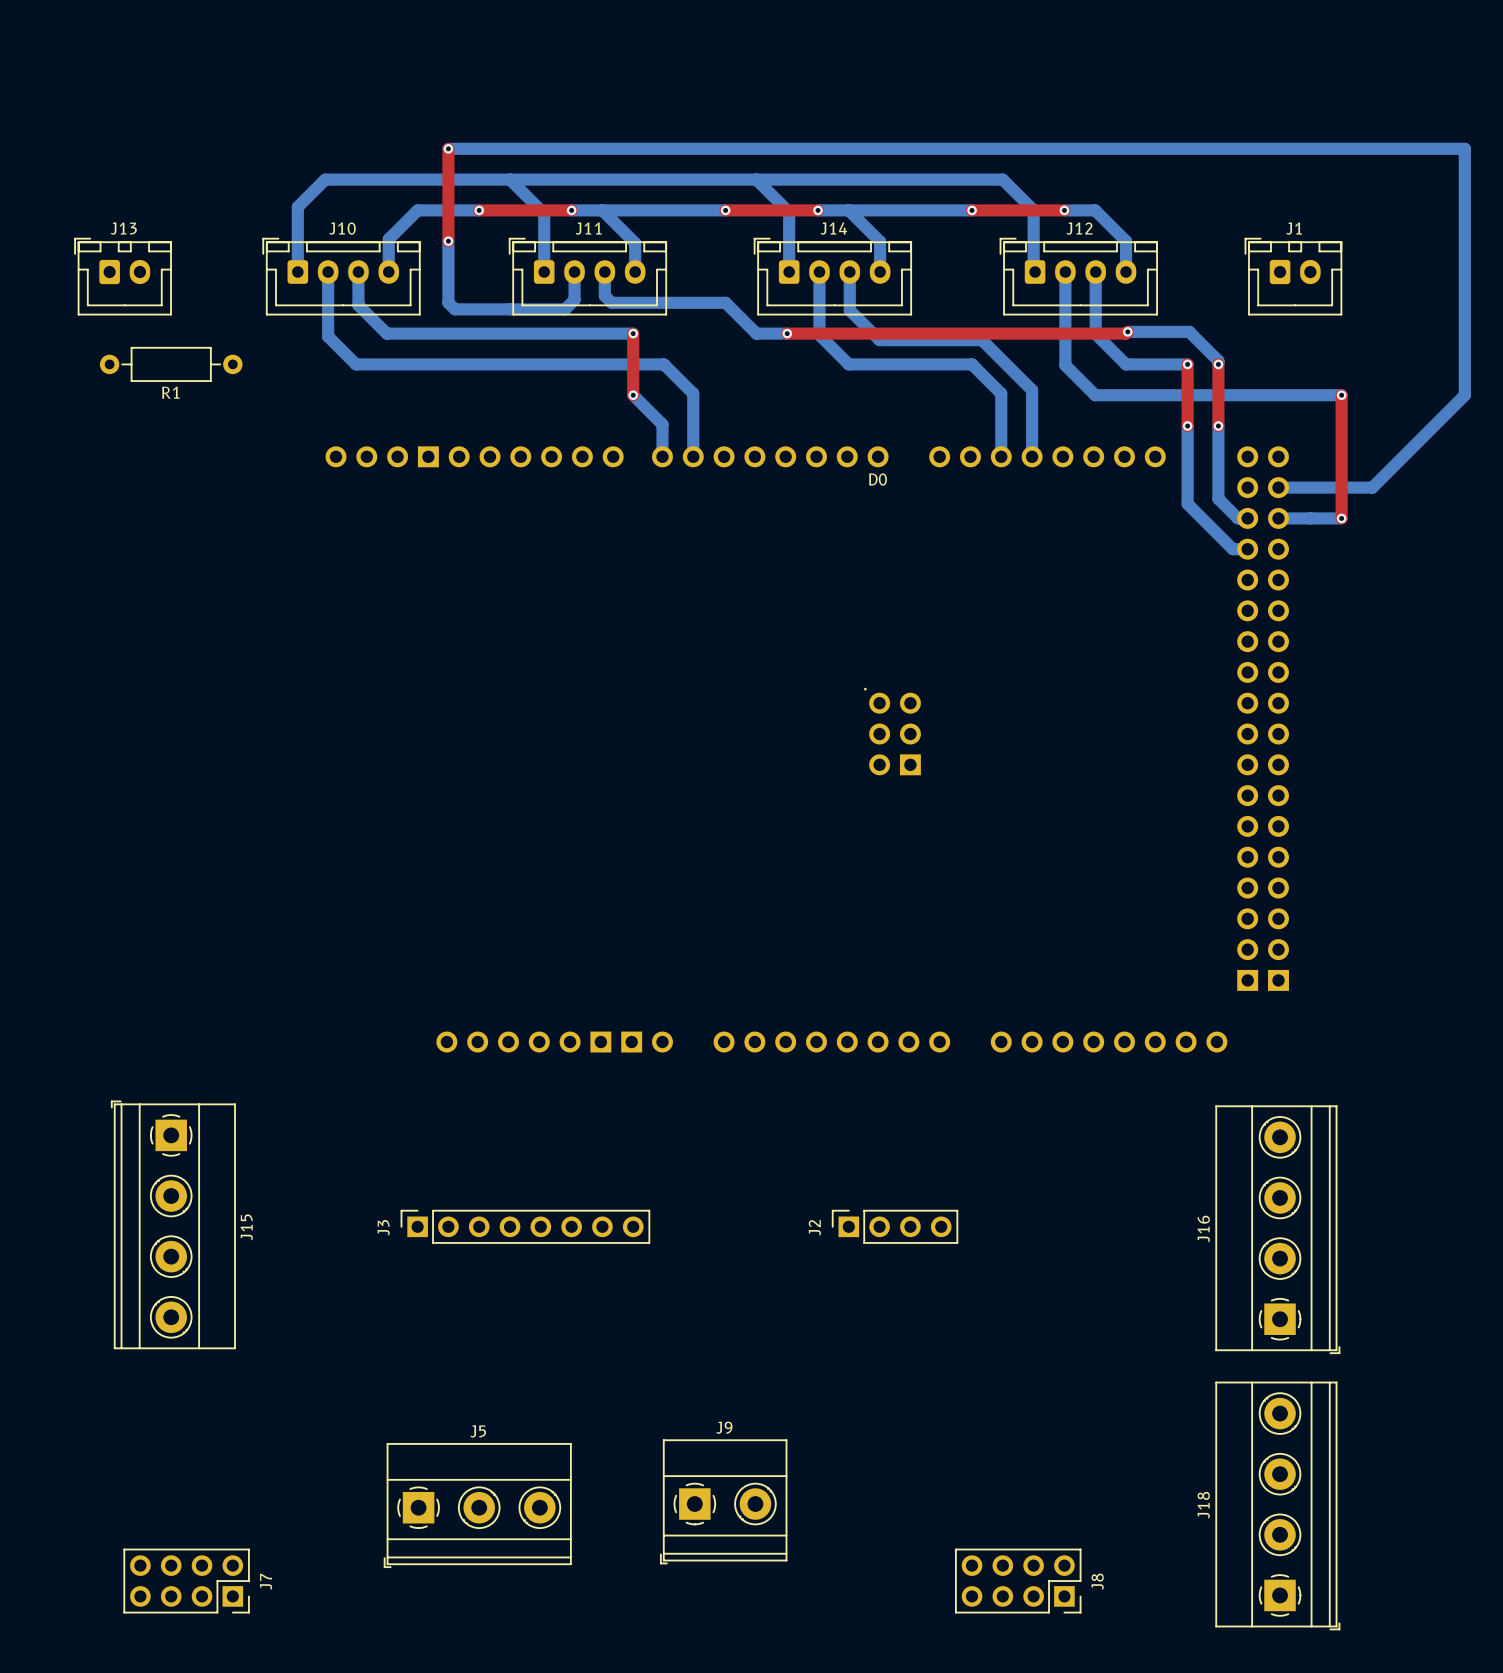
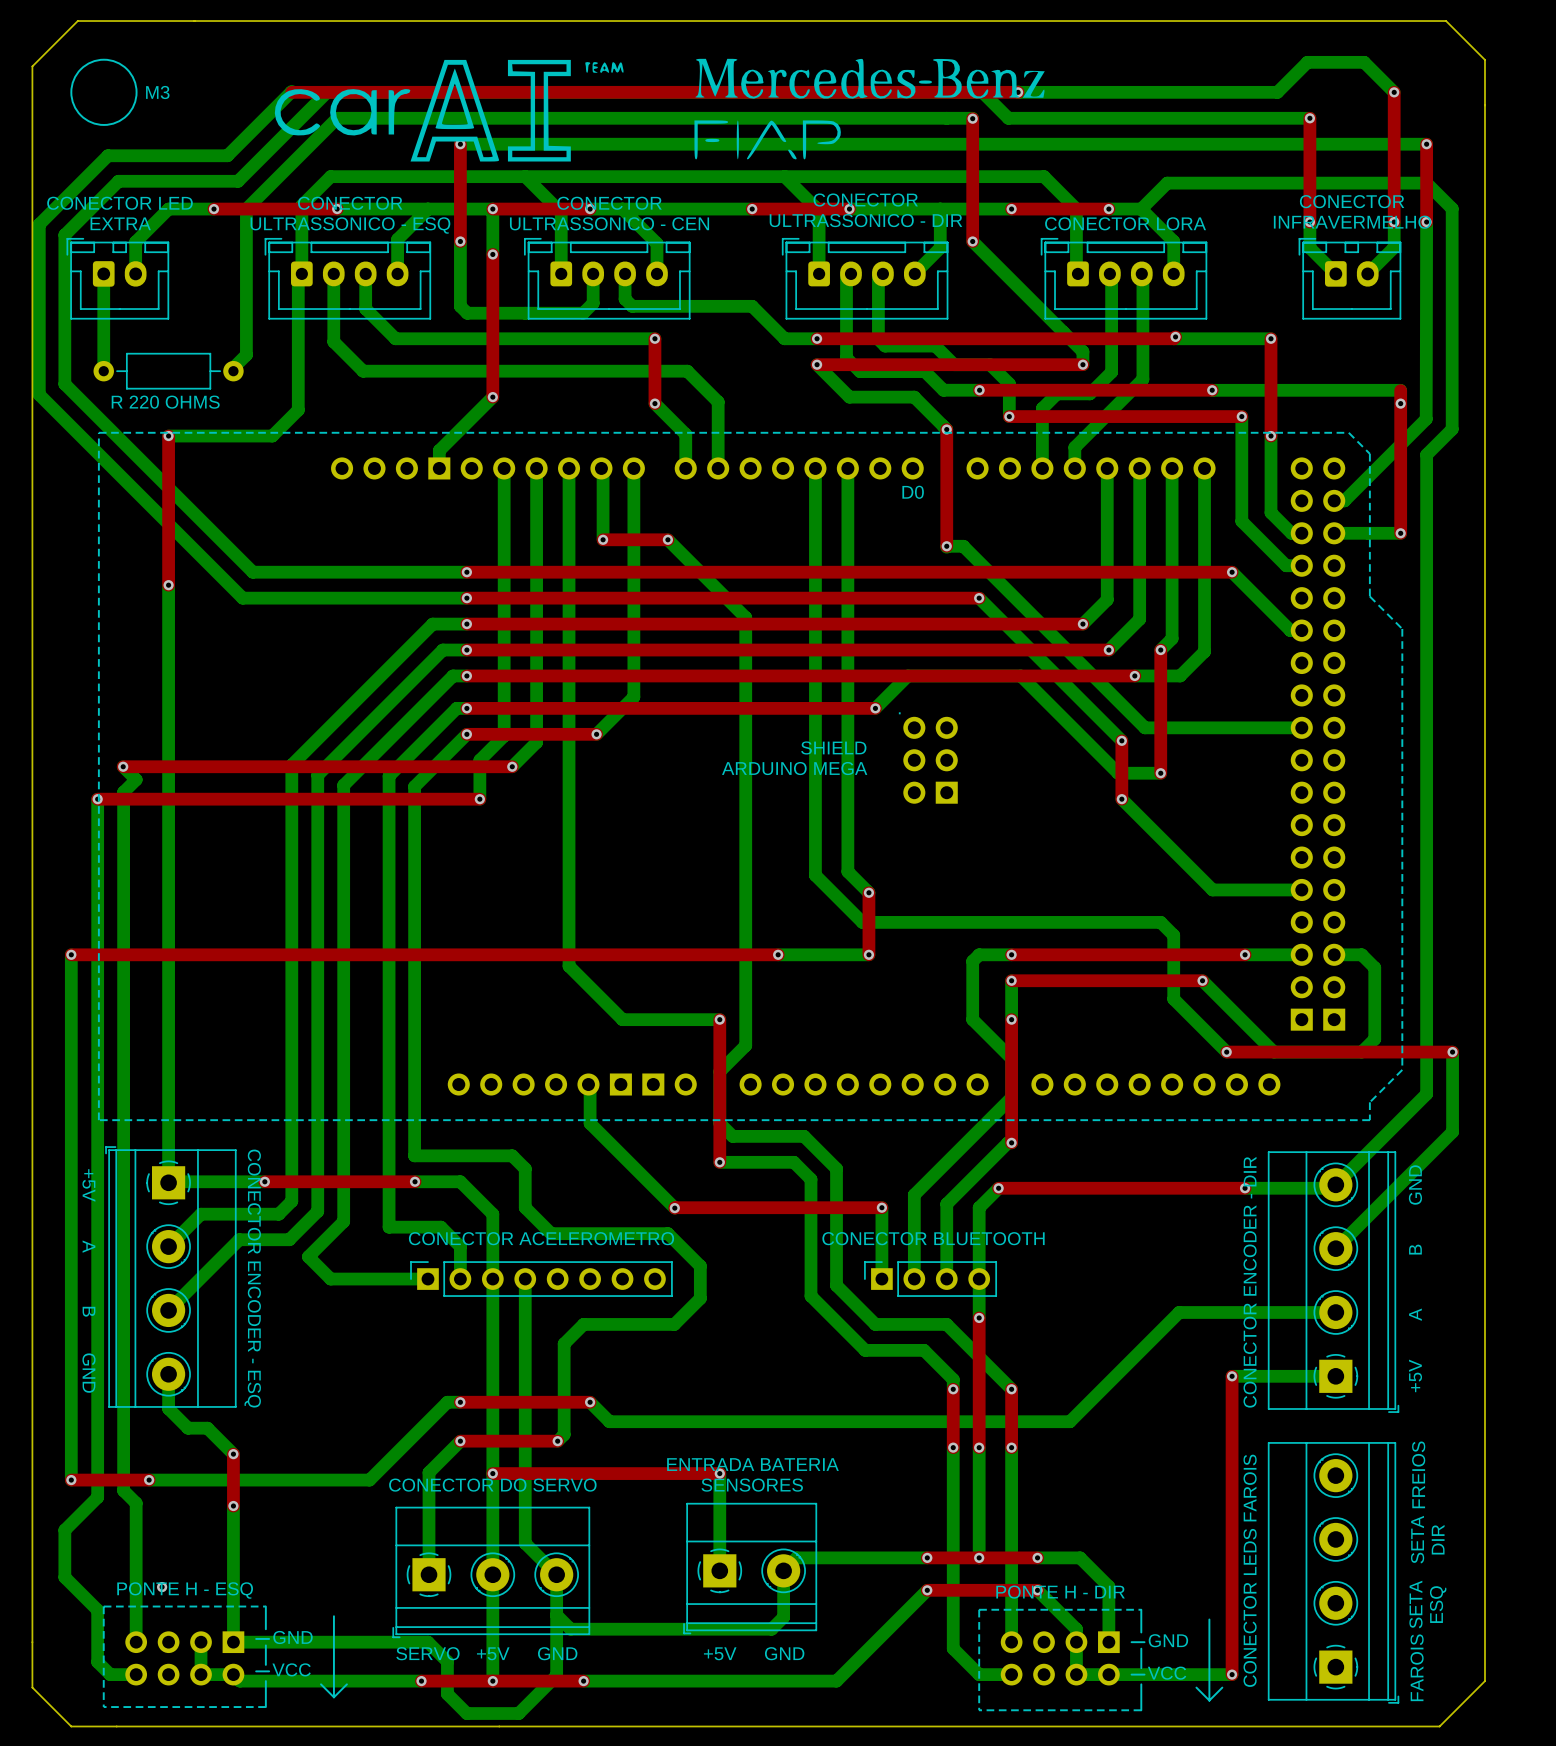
board edge: none -> (77, 21) (1446, 21) (1484, 59) (1484, 1681) (1439, 1726) (71, 1726) (32, 1687) (32, 66) (77, 21)
drawing: none -> [70, 58, 138, 126]
drawing: none -> [274, 58, 1045, 162]
bottom track: none -> (291, 91) (227, 155) (107, 155) (39, 224) (39, 394) (242, 598) (466, 598)
text: none -> M3 (157, 92)
top track: none -> (291, 92) (1018, 92)
bottom track: none -> (1018, 91) (1277, 92) (1307, 62) (1364, 62) (1394, 92)
via: none -> (1018, 92)
top track: none -> (1394, 92) (1394, 222)
via: none -> (1394, 92)
bottom track: none -> (972, 118) (337, 118) (246, 209) (246, 354) (233, 367)
top track: none -> (972, 118) (972, 241)
via: none -> (972, 118)
bottom track: none -> (1309, 118) (1008, 118) (982, 92) (327, 92) (238, 181) (118, 181) (64, 235) (64, 384) (252, 572) (466, 572)
top track: none -> (1309, 118) (1309, 222)
via: none -> (1309, 118)
bottom track: (1366, 148) (1464, 148) (1464, 395) (1372, 487) (1288, 487) -> (1426, 222) (1426, 419) (1344, 500)
top track: none -> (1426, 144) (1426, 222)
via: none -> (1426, 144)
text: none -> CONECTOR (865, 200)
text: none -> CONECTOR (1352, 201)
text: none -> CONECTOR LED (119, 203)
text: none -> CONECTOR (350, 203)
text: none -> CONECTOR (609, 203)
bottom track: none -> (213, 209) (168, 209) (135, 242) (135, 273)
top track: none -> (213, 209) (337, 209)
via: none -> (213, 209)
bottom track: none -> (337, 209) (427, 209)
via: none -> (337, 209)
bottom track: none -> (492, 209) (492, 254)
bottom track: (848, 210) (880, 241) (880, 272) -> none
bottom track: none -> (940, 209) (940, 247) (914, 273) (910, 273)
bottom track: none -> (1141, 209) (1167, 183) (1426, 183) (1452, 208) (1452, 429) (1426, 454) (1426, 1094) (1332, 1188) (1245, 1188)
text: none -> ULTRASSONICO - DIR (865, 220)
bottom track: none -> (1309, 222) (1309, 247) (1335, 273)
via: none -> (1309, 222)
text: none -> INFRAVERMELHO (1352, 222)
bottom track: none -> (1394, 222) (1394, 247) (1367, 273)
via: none -> (1394, 222)
via: none -> (1426, 222)
text: none -> EXTRA (120, 223)
text: none -> ULTRASSONICO - CEN (609, 223)
text: none -> CONECTOR LORA (1125, 223)
text: none -> ULTRASSONICO - ESQ (350, 225)
J13 name: J13 (123, 228) -> none
J10 name: J10 (342, 228) -> none
J11 name: J11 (588, 228) -> none
J14 name: J14 (833, 228) -> none
J12 name: J12 (1079, 228) -> none
J1 name: J1 (1294, 228) -> none
bottom track: none -> (972, 241) (1082, 351) (1082, 364)
via: none -> (972, 241)
top track: none -> (492, 254) (492, 397)
via: none -> (492, 254)
bottom track: none -> (846, 273) (846, 358) (860, 371) (924, 371) (943, 390) (979, 390)
bottom track: none -> (878, 273) (878, 339) (885, 346) (935, 346) (954, 364) (990, 364) (1009, 383) (1009, 416)
bottom track: none -> (103, 273) (103, 367)
bottom track: none -> (301, 273) (298, 277) (298, 410) (272, 436) (168, 436)
bottom track: (819, 272) (819, 335) (848, 364) (972, 364) (1001, 393) (1001, 399) -> (1111, 273) (1111, 372) (1089, 393) (1057, 393) (1042, 408)
bottom track: (849, 272) (849, 310) (879, 340) (982, 340) (1032, 390) (1032, 436) -> (1143, 273) (1142, 379) (1074, 447)
bottom track: (1065, 272) (1065, 365) (1095, 395) (1341, 395) -> none
bottom track: (1095, 272) (1095, 334) (1126, 364) (1187, 364) -> none
bottom track: (1127, 331) (1189, 331) (1218, 360) (1218, 364) -> none
bottom track: none -> (1173, 338) (1270, 338)
top track: none -> (1270, 338) (1270, 371)
via: none -> (1270, 338)
bottom track: none -> (817, 364) (849, 397) (914, 397) (946, 429)
top track: none -> (817, 364) (1082, 364)
via: none -> (817, 364)
via: none -> (1082, 364)
top track: (1187, 364) (1187, 426) -> none
via: (1187, 364) -> none
via: (1218, 364) -> none
top track: none -> (979, 390) (1212, 390)
via: none -> (979, 390)
bottom track: none -> (1212, 390) (1400, 390)
via: none -> (1212, 390)
top track: none -> (1400, 390) (1400, 403)
bottom track: none -> (492, 397) (439, 450) (439, 468)
via: none -> (492, 397)
R1 name: R1 (170, 392) -> none
text: none -> R 220 OHMS (165, 402)
top track: none -> (1009, 416) (1241, 416)
via: none -> (1009, 416)
top track: none -> (946, 429) (946, 546)
via: none -> (946, 429)
line: none -> (98, 432) (98, 1120) (1369, 1120) (1369, 1102) (1402, 1069) (1402, 628) (1369, 596) (1369, 453) (1348, 432) (98, 432)
top track: none -> (168, 436) (168, 585)
via: none -> (168, 436)
bottom track: (1187, 426) (1187, 503) (1190, 507) -> (1241, 416) (1241, 521)
via position: (1187, 426) -> (1241, 416)
bottom track: none -> (504, 468) (504, 735) (479, 760) (479, 799)
bottom track: none -> (536, 468) (536, 742) (512, 766)
bottom track: none -> (569, 468) (569, 966) (622, 1019) (719, 1019)
bottom track: none -> (601, 468) (603, 470) (603, 539)
bottom track: none -> (633, 468) (633, 697) (596, 734)
bottom track: none -> (815, 468) (815, 875) (862, 922) (1160, 922) (1173, 935) (1173, 999) (1226, 1052)
bottom track: none -> (847, 468) (847, 871) (868, 892)
bottom track: none -> (1107, 468) (1107, 599) (1082, 624)
bottom track: none -> (1139, 468) (1139, 619) (1108, 650)
bottom track: none -> (1172, 468) (1172, 638) (1160, 650)
bottom track: none -> (1204, 468) (1204, 651) (1180, 675) (1134, 675)
top track: none -> (603, 539) (667, 539)
via: none -> (603, 539)
bottom track: none -> (667, 539) (745, 617) (745, 1045) (719, 1071) (719, 1123) (732, 1136) (804, 1136) (836, 1168) (836, 1285) (875, 1324) (946, 1324) (1011, 1389)
via: none -> (667, 539)
via: none -> (946, 546)
bottom track: none -> (946, 547) (963, 546) (1144, 727) (1301, 727)
top track: none -> (466, 572) (1232, 572)
via: none -> (466, 572)
bottom track: none -> (1232, 572) (1290, 630) (1301, 630)
via: none -> (1232, 572)
bottom track: none -> (168, 585) (168, 1182) (264, 1181)
via: none -> (168, 585)
top track: none -> (466, 598) (979, 598)
via: none -> (466, 598)
bottom track: none -> (979, 598) (1121, 740)
via: none -> (979, 598)
bottom track: none -> (466, 624) (432, 624) (291, 764) (291, 1201) (278, 1214) (201, 1214) (168, 1246)
top track: none -> (466, 624) (1082, 624)
via: none -> (466, 624)
via: none -> (1082, 624)
bottom track: none -> (466, 650) (442, 650) (317, 775) (317, 1211) (289, 1239) (239, 1239) (168, 1310)
top track: none -> (466, 650) (1108, 650)
via: none -> (466, 650)
via: none -> (1108, 650)
top track: none -> (1160, 650) (1160, 773)
via: none -> (1160, 650)
bottom track: none -> (466, 675) (453, 675) (343, 785) (343, 1221) (308, 1256) (330, 1279) (427, 1279)
top track: none -> (466, 675) (1134, 675)
via: none -> (466, 675)
via: none -> (1134, 675)
bottom track: none -> (466, 708) (456, 708) (389, 776) (389, 1227) (440, 1227) (460, 1246) (460, 1279)
top track: none -> (466, 708) (875, 708)
via: none -> (466, 708)
bottom track: none -> (875, 708) (907, 675) (1020, 675) (1118, 773) (1160, 773)
via: none -> (875, 708)
bottom track: none -> (466, 734) (414, 786) (414, 1155) (512, 1155) (525, 1168) (525, 1207) (551, 1233) (667, 1233) (700, 1266) (700, 1298) (674, 1324) (583, 1324) (564, 1343) (564, 1434) (557, 1441)
top track: none -> (466, 734) (596, 734)
via: none -> (466, 734)
via: none -> (596, 734)
top track: none -> (1121, 740) (1121, 799)
via: none -> (1121, 740)
text: none -> SHIELD (833, 747)
bottom track: none -> (123, 766) (136, 779) (123, 792) (123, 1490) (136, 1503) (136, 1642)
top track: none -> (123, 766) (512, 766)
via: none -> (123, 766)
via: none -> (512, 766)
text: none -> ARDUINO MEGA (794, 768)
via: none -> (1160, 773)
bottom track: none -> (97, 799) (97, 1497) (64, 1530) (64, 1577) (97, 1610) (97, 1662) (110, 1674) (136, 1674)
top track: none -> (97, 799) (479, 799)
via: none -> (97, 799)
via: none -> (479, 799)
bottom track: none -> (1121, 799) (1212, 889) (1301, 889)
via: none -> (1121, 799)
top track: none -> (868, 892) (868, 954)
via: none -> (868, 892)
bottom track: none -> (71, 954) (71, 1480)
top track: none -> (71, 954) (778, 954)
via: none -> (71, 954)
bottom track: none -> (778, 954) (868, 954)
via: none -> (778, 954)
via: none -> (868, 954)
bottom track: none -> (1011, 954) (979, 954) (972, 961) (972, 1019) (1011, 1058) (1011, 1097) (914, 1194) (914, 1279)
top track: none -> (1011, 954) (1245, 954)
via: none -> (1011, 954)
bottom track: none -> (1245, 954) (1301, 954)
via: none -> (1245, 954)
bottom track: none -> (1334, 954) (1361, 954) (1374, 967) (1374, 1039) (1361, 1052) (1273, 1052) (1202, 980)
bottom track: none -> (1011, 980) (1011, 1019)
top track: none -> (1011, 980) (1202, 980)
via: none -> (1011, 980)
via: none -> (1202, 980)
top track: none -> (719, 1019) (719, 1162)
via: none -> (719, 1019)
top track: none -> (1011, 1019) (1011, 1142)
via: none -> (1011, 1019)
top track: none -> (1226, 1052) (1452, 1052)
via: none -> (1226, 1052)
bottom track: none -> (1452, 1052) (1452, 1131) (1335, 1248)
via: none -> (1452, 1052)
bottom track: none -> (588, 1084) (590, 1086) (590, 1123) (674, 1208)
bottom track: none -> (1011, 1142) (1007, 1142) (946, 1204) (946, 1279)
via: none -> (1011, 1142)
bottom track: none -> (719, 1162) (793, 1162) (810, 1179) (810, 1296) (865, 1350) (924, 1350) (953, 1379) (953, 1389)
via: none -> (719, 1162)
top track: none -> (264, 1181) (415, 1181)
via: none -> (264, 1181)
bottom track: none -> (415, 1181) (460, 1181) (492, 1214) (492, 1681)
via: none -> (415, 1181)
text: none -> +5V (88, 1185)
text: none -> GND (1415, 1184)
bottom track: none -> (998, 1188) (979, 1207) (979, 1317)
top track: none -> (998, 1188) (1245, 1188)
via: none -> (998, 1188)
via: none -> (1245, 1188)
via: none -> (674, 1208)
bottom track: none -> (881, 1207) (881, 1279)
top track: none -> (881, 1207) (674, 1208)
via: none -> (881, 1207)
text: none -> CONECTOR ACELEROMETRO (541, 1238)
text: none -> CONECTOR BLUETOOTH (933, 1238)
text: none -> A (88, 1246)
text: none -> B (1415, 1249)
text: none -> CONECTOR ENCODER - ESQ (252, 1278)
bottom track: none -> (525, 1279) (525, 1543) (556, 1574) (556, 1675) (518, 1713) (466, 1713) (447, 1694) (447, 1661) (427, 1642) (233, 1642) (233, 1506)
J15 name: J15 (246, 1227) -> none
J3 name: J3 (383, 1227) -> none
J2 name: J2 (814, 1227) -> none
J16 name: J16 (1203, 1228) -> none
text: none -> CONECTOR ENCODER - DIR (1250, 1282)
text: none -> B (88, 1311)
bottom track: none -> (1335, 1312) (1179, 1312) (1069, 1421) (609, 1421) (590, 1402)
text: none -> A (1415, 1314)
top track: none -> (979, 1317) (979, 1447)
via: none -> (979, 1317)
text: none -> GND (89, 1373)
bottom track: none -> (168, 1374) (168, 1408) (188, 1428) (207, 1428) (233, 1454)
bottom track: none -> (1232, 1376) (1335, 1376)
top track: none -> (1232, 1376) (1232, 1674)
via: none -> (1232, 1376)
text: none -> +5V (1415, 1375)
top track: none -> (953, 1389) (953, 1447)
via: none -> (953, 1389)
top track: none -> (1011, 1389) (1011, 1447)
via: none -> (1011, 1389)
bottom track: none -> (460, 1402) (447, 1402) (369, 1480) (149, 1480)
top track: none -> (460, 1402) (590, 1402)
via: none -> (460, 1402)
via: none -> (590, 1402)
bottom track: none -> (460, 1441) (429, 1472) (429, 1574)
top track: none -> (460, 1441) (557, 1441)
via: none -> (460, 1441)
via: none -> (557, 1441)
bottom track: none -> (953, 1447) (953, 1648) (979, 1674) (1011, 1674)
via: none -> (953, 1447)
bottom track: none -> (979, 1447) (979, 1557)
via: none -> (979, 1447)
bottom track: none -> (1011, 1447) (1011, 1642)
via: none -> (1011, 1447)
top track: none -> (233, 1454) (233, 1506)
via: none -> (233, 1454)
text: none -> ENTRADA BATERIA (752, 1464)
top track: none -> (492, 1473) (719, 1473)
via: none -> (492, 1473)
bottom track: none -> (719, 1473) (719, 1570)
via: none -> (719, 1473)
text: none -> FREIOS (1418, 1474)
top track: none -> (71, 1480) (149, 1480)
via: none -> (71, 1480)
via: none -> (149, 1480)
text: none -> CONECTOR DO SERVO (492, 1485)
text: none -> SENSORES (752, 1485)
J9 name: J9 (724, 1427) -> none
J5 name: J5 (478, 1431) -> none
via: none -> (233, 1506)
text: none -> SETA (1417, 1539)
text: none -> DIR (1438, 1539)
bottom track: none -> (927, 1557) (796, 1557) (783, 1570) (783, 1617) (771, 1629) (570, 1629) (556, 1615)
top track: none -> (927, 1557) (1037, 1557)
via: none -> (927, 1557)
via: none -> (979, 1557)
bottom track: none -> (1037, 1557) (1080, 1557) (1108, 1586) (1108, 1642)
via: none -> (1037, 1557)
text: none -> CONECTOR LEDS FAROIS (1250, 1570)
J18 name: J18 (1203, 1505) -> none
via: none -> (162, 1587)
text: none -> PONTE H - ESQ (185, 1590)
bottom track: none -> (927, 1590) (836, 1681) (583, 1681)
top track: none -> (927, 1590) (1037, 1590)
via: none -> (927, 1590)
bottom track: none -> (1037, 1590) (1076, 1629) (1076, 1674) (1232, 1674)
via: none -> (1037, 1590)
text: none -> PONTE H - DIR (1060, 1592)
text: none -> SETA (1415, 1604)
text: none -> ESQ (1438, 1604)
line: none -> (333, 1616) (333, 1697)
line: none -> (1209, 1619) (1209, 1700)
line: none -> (265, 1629) (265, 1606) (103, 1606) (103, 1707) (265, 1707) (265, 1681)
line: none -> (1141, 1632) (1141, 1609) (979, 1609) (979, 1710) (1141, 1710) (1141, 1684)
text: none -> GND (292, 1637)
line: none -> (256, 1638) (269, 1638)
text: none -> GND (1168, 1640)
bottom track: none -> (201, 1642) (201, 1674) (233, 1674) (239, 1681) (421, 1681)
line: none -> (1131, 1642) (1144, 1642)
line: none -> (265, 1645) (265, 1664)
line: none -> (1141, 1648) (1141, 1668)
J7 side: top (186, 1581) -> bottom (184, 1658)
J8 side: top (1018, 1581) -> bottom (1060, 1658)
text: none -> SERVO (427, 1653)
text: none -> +5V (493, 1653)
text: none -> GND (557, 1653)
text: none -> +5V (720, 1653)
text: none -> GND (784, 1653)
text: none -> FAROIS (1417, 1667)
text: none -> VCC (291, 1669)
line: none -> (256, 1671) (269, 1671)
text: none -> VCC (1167, 1673)
line: none -> (1131, 1674) (1144, 1674)
via: none -> (1232, 1674)
top track: none -> (421, 1681) (583, 1681)
via: none -> (421, 1681)
via: none -> (492, 1681)
via: none -> (583, 1681)
line: none -> (320, 1684) (333, 1697)
line: none -> (346, 1684) (333, 1697)
line: none -> (1196, 1687) (1209, 1700)
line: none -> (1222, 1687) (1209, 1700)

